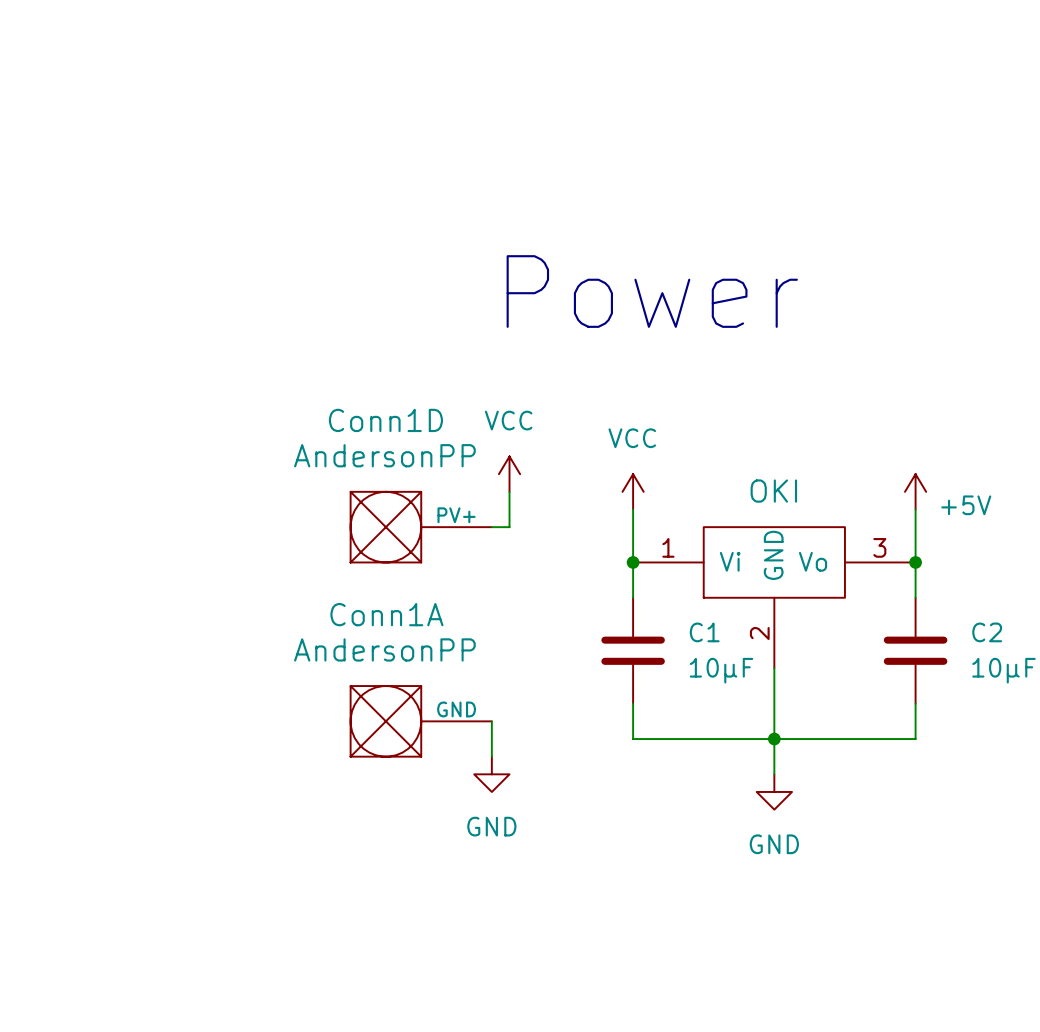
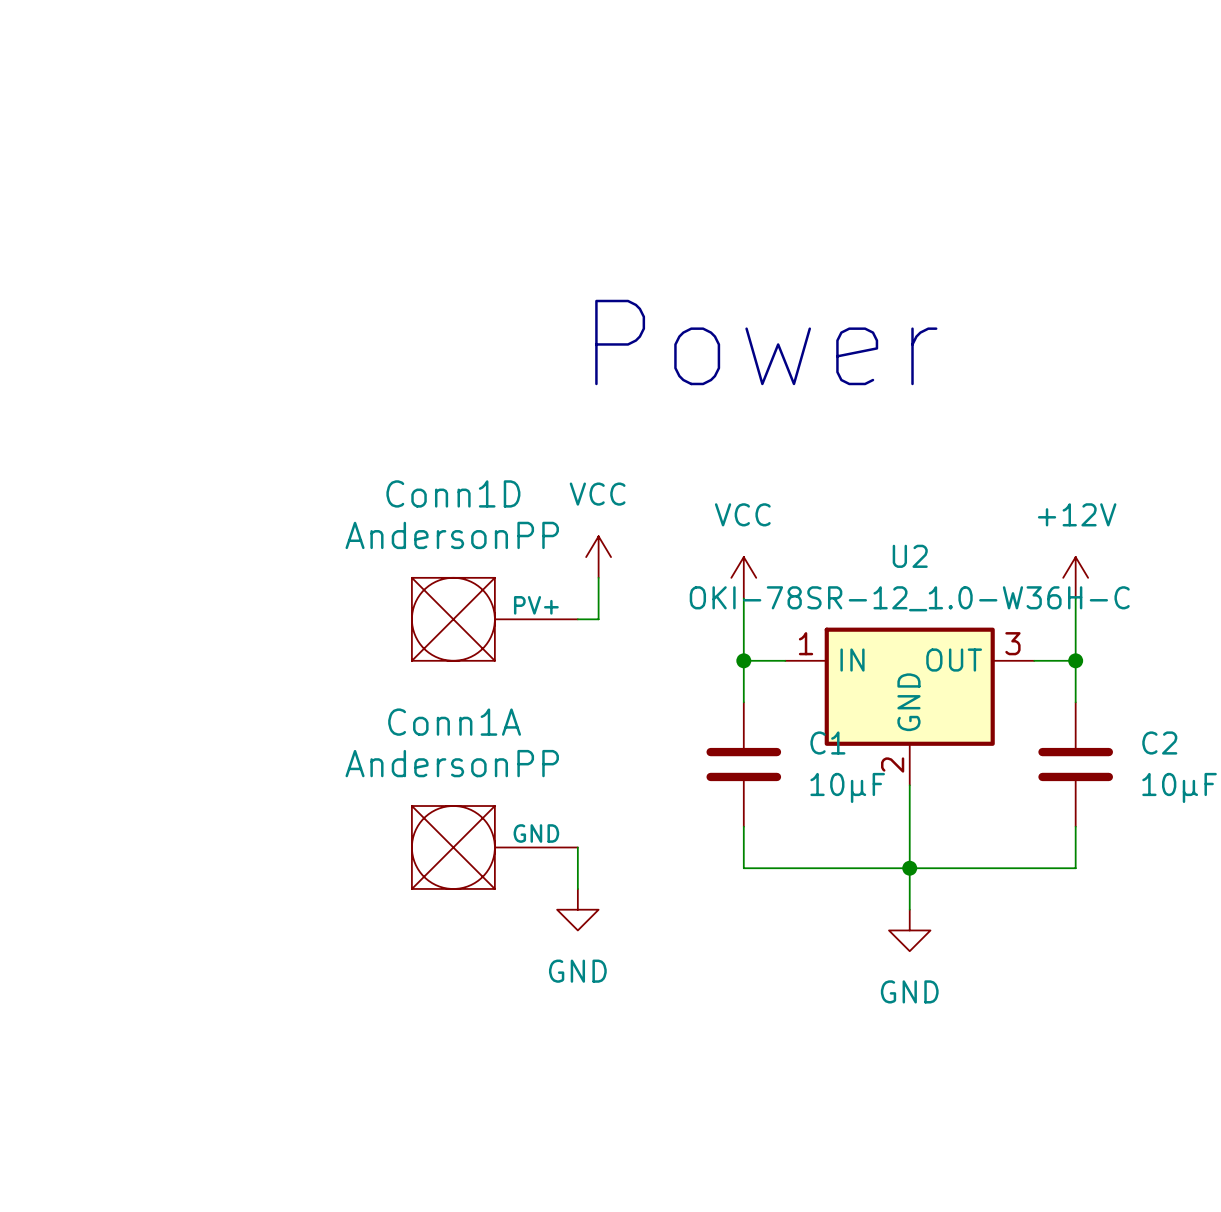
power symbol: +5V (915, 491) -> +12V (1075, 577)
part: OKI (774, 597) -> none
U2: none -> OKI-78SR-12_1.0-W36H-C (909, 706)

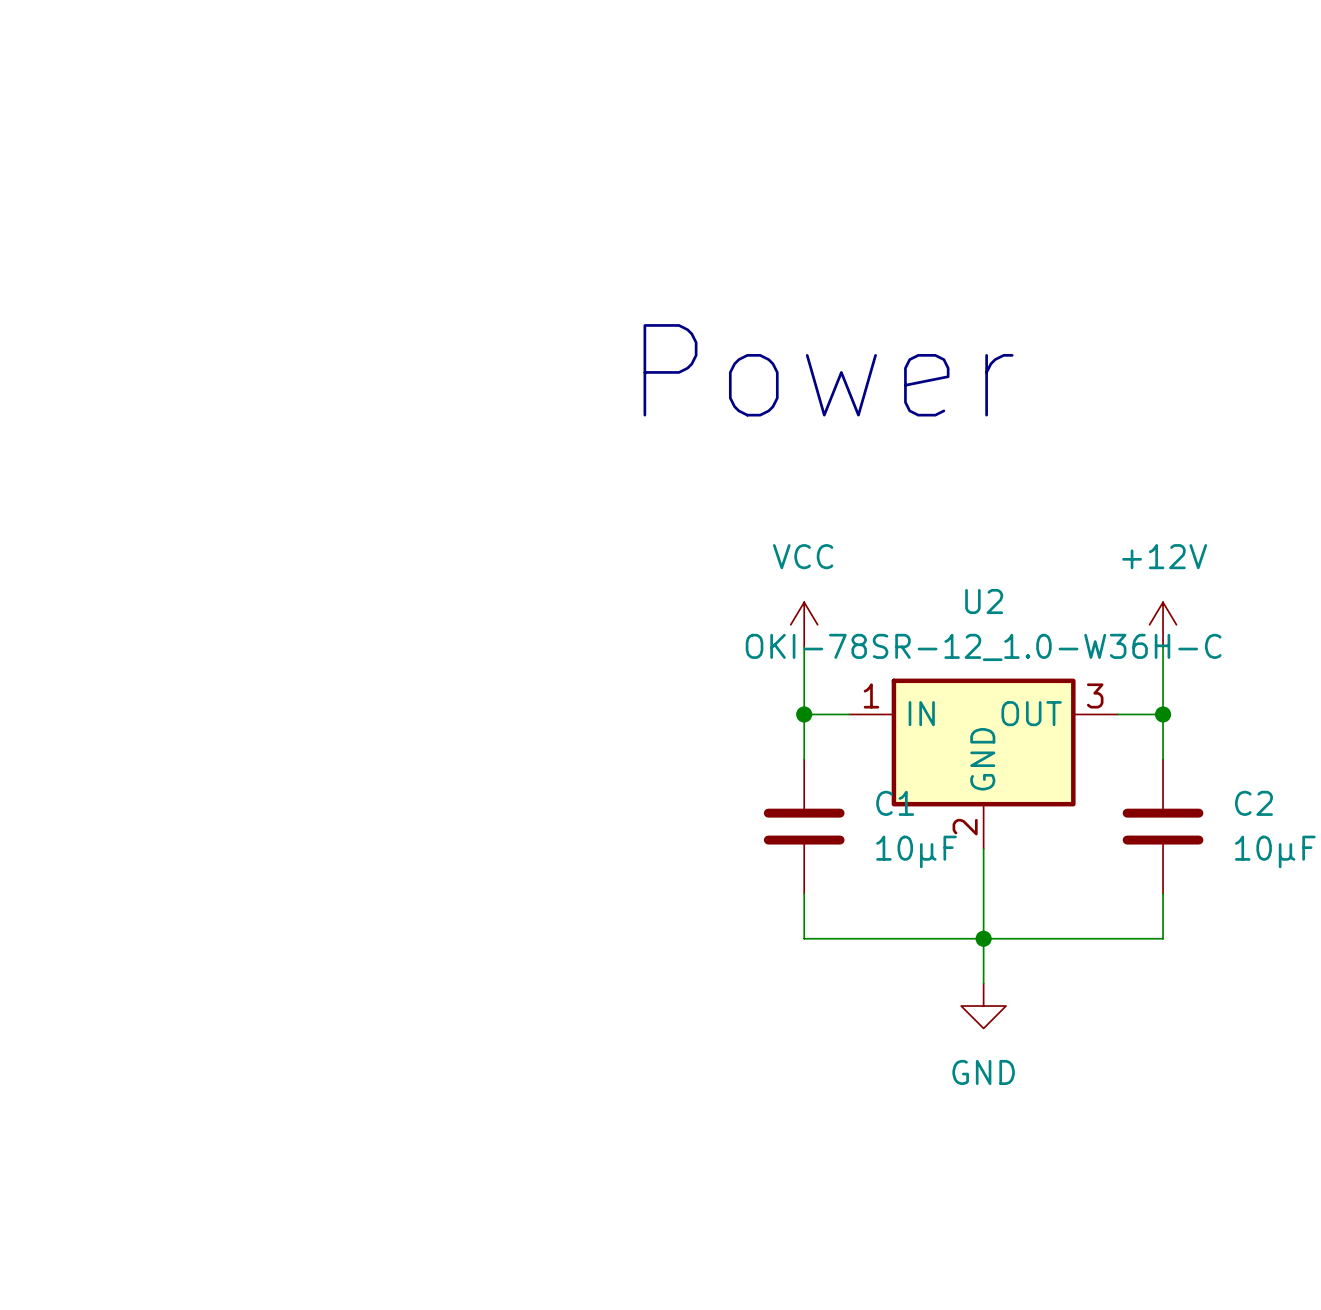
power symbol: VCC (598, 557) -> none
wire: (598, 577) (598, 619) (577, 619) -> none
Conn1D: AndersonPP (494, 619) -> none
Conn1A: AndersonPP (494, 847) -> none
wire: (577, 847) (577, 888) -> none
power symbol: GND (577, 909) -> none

